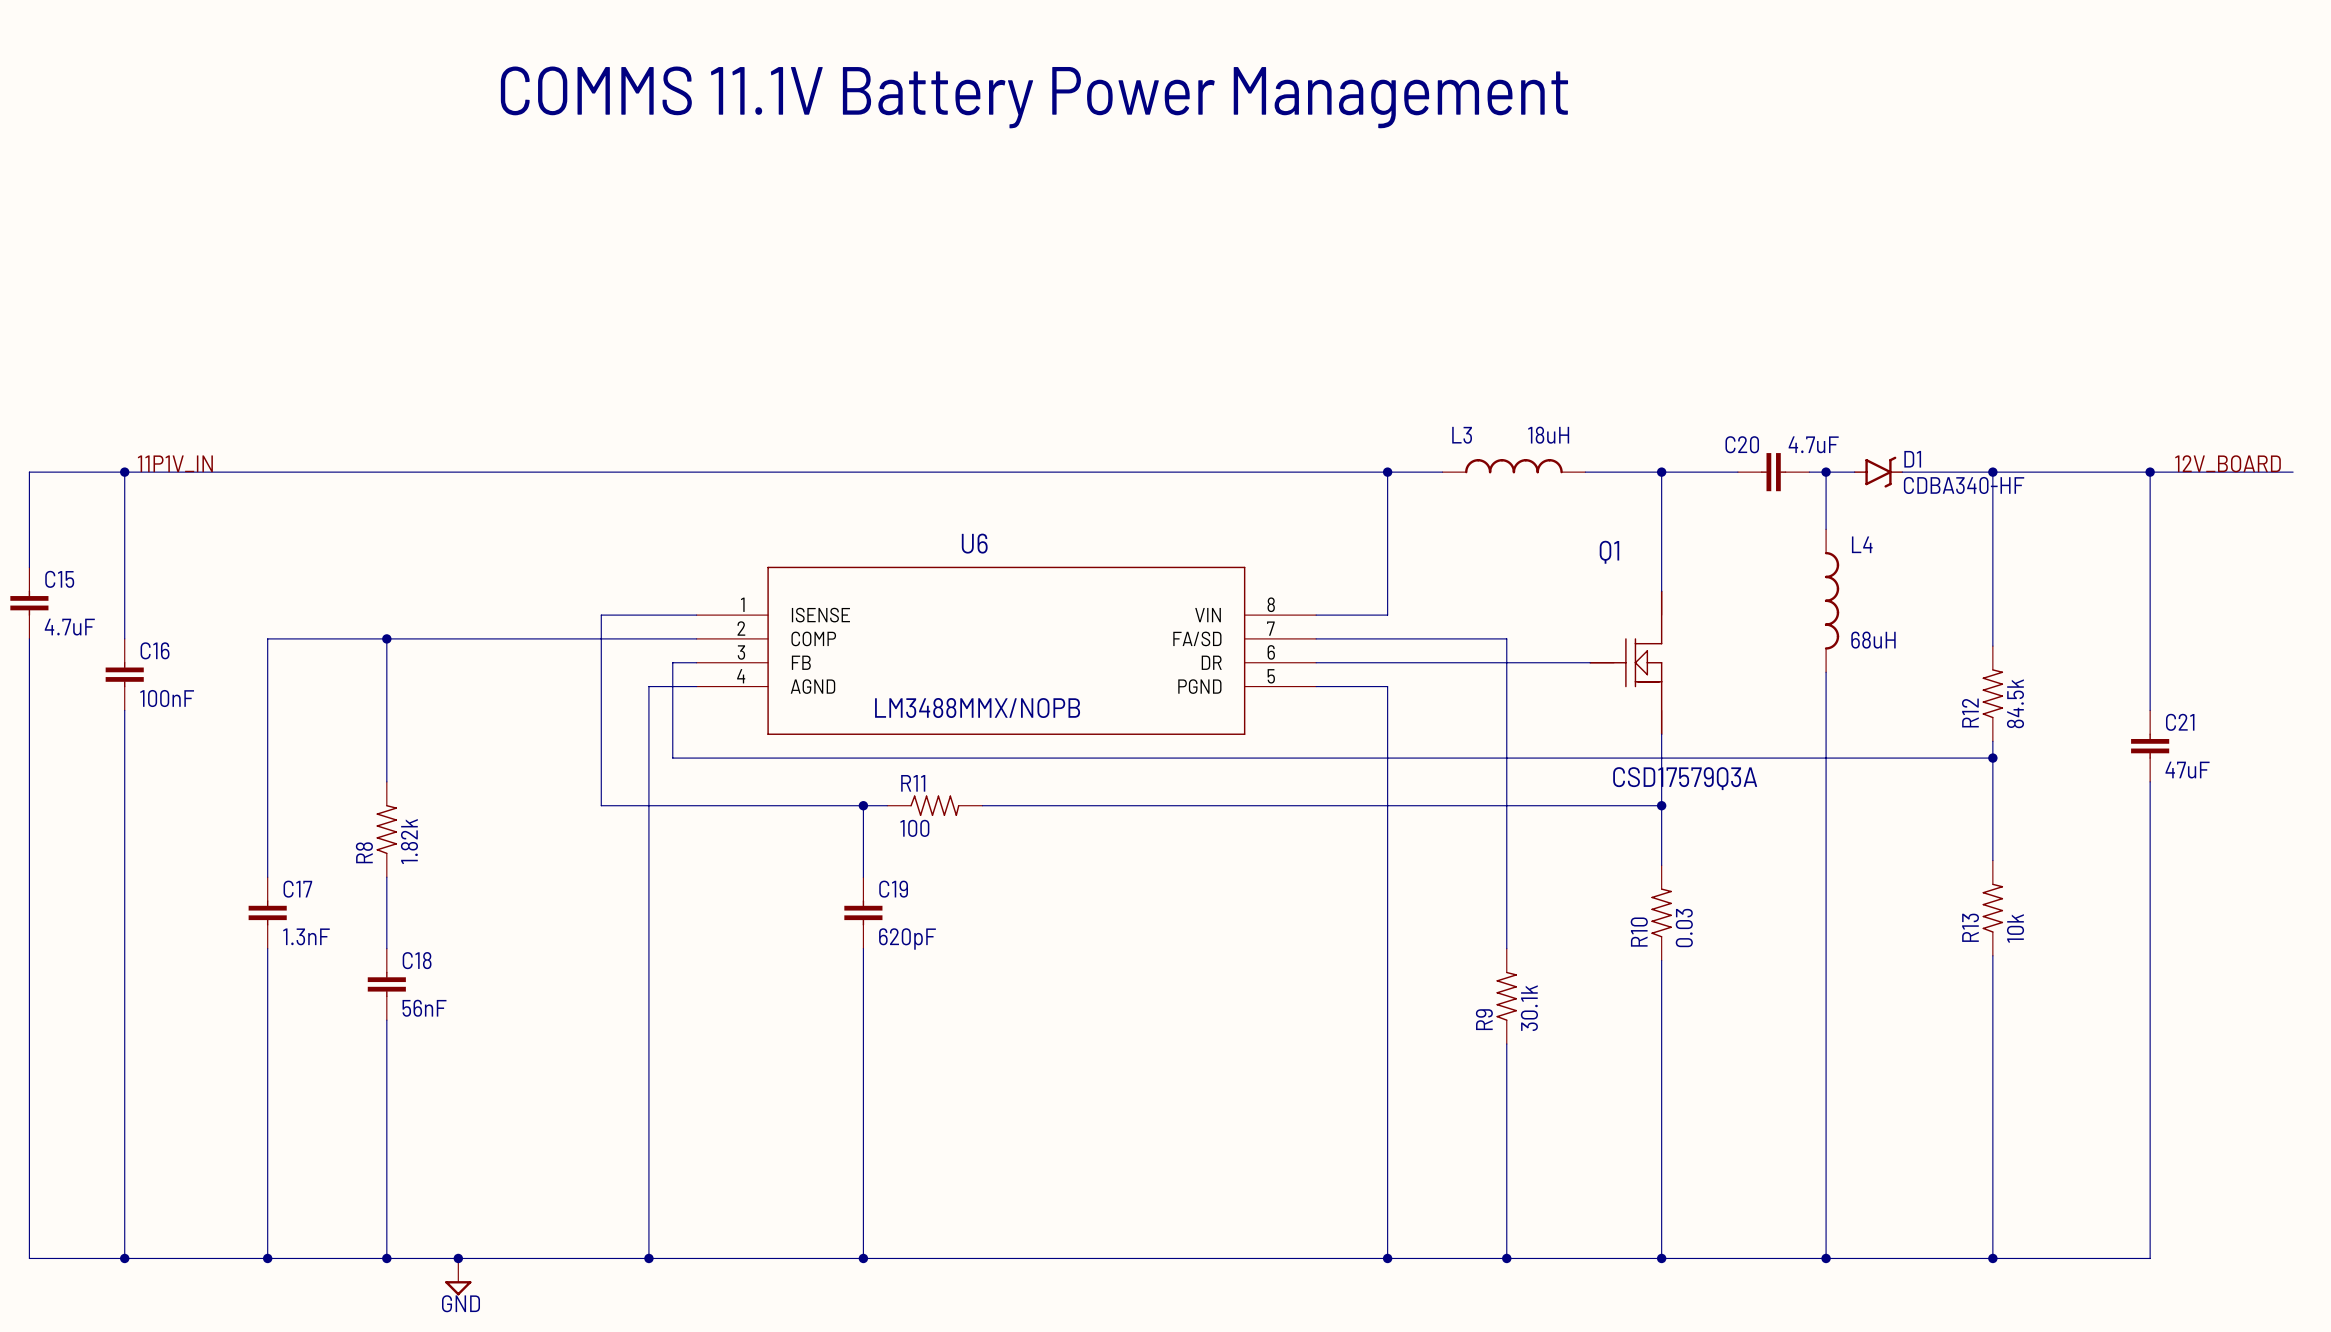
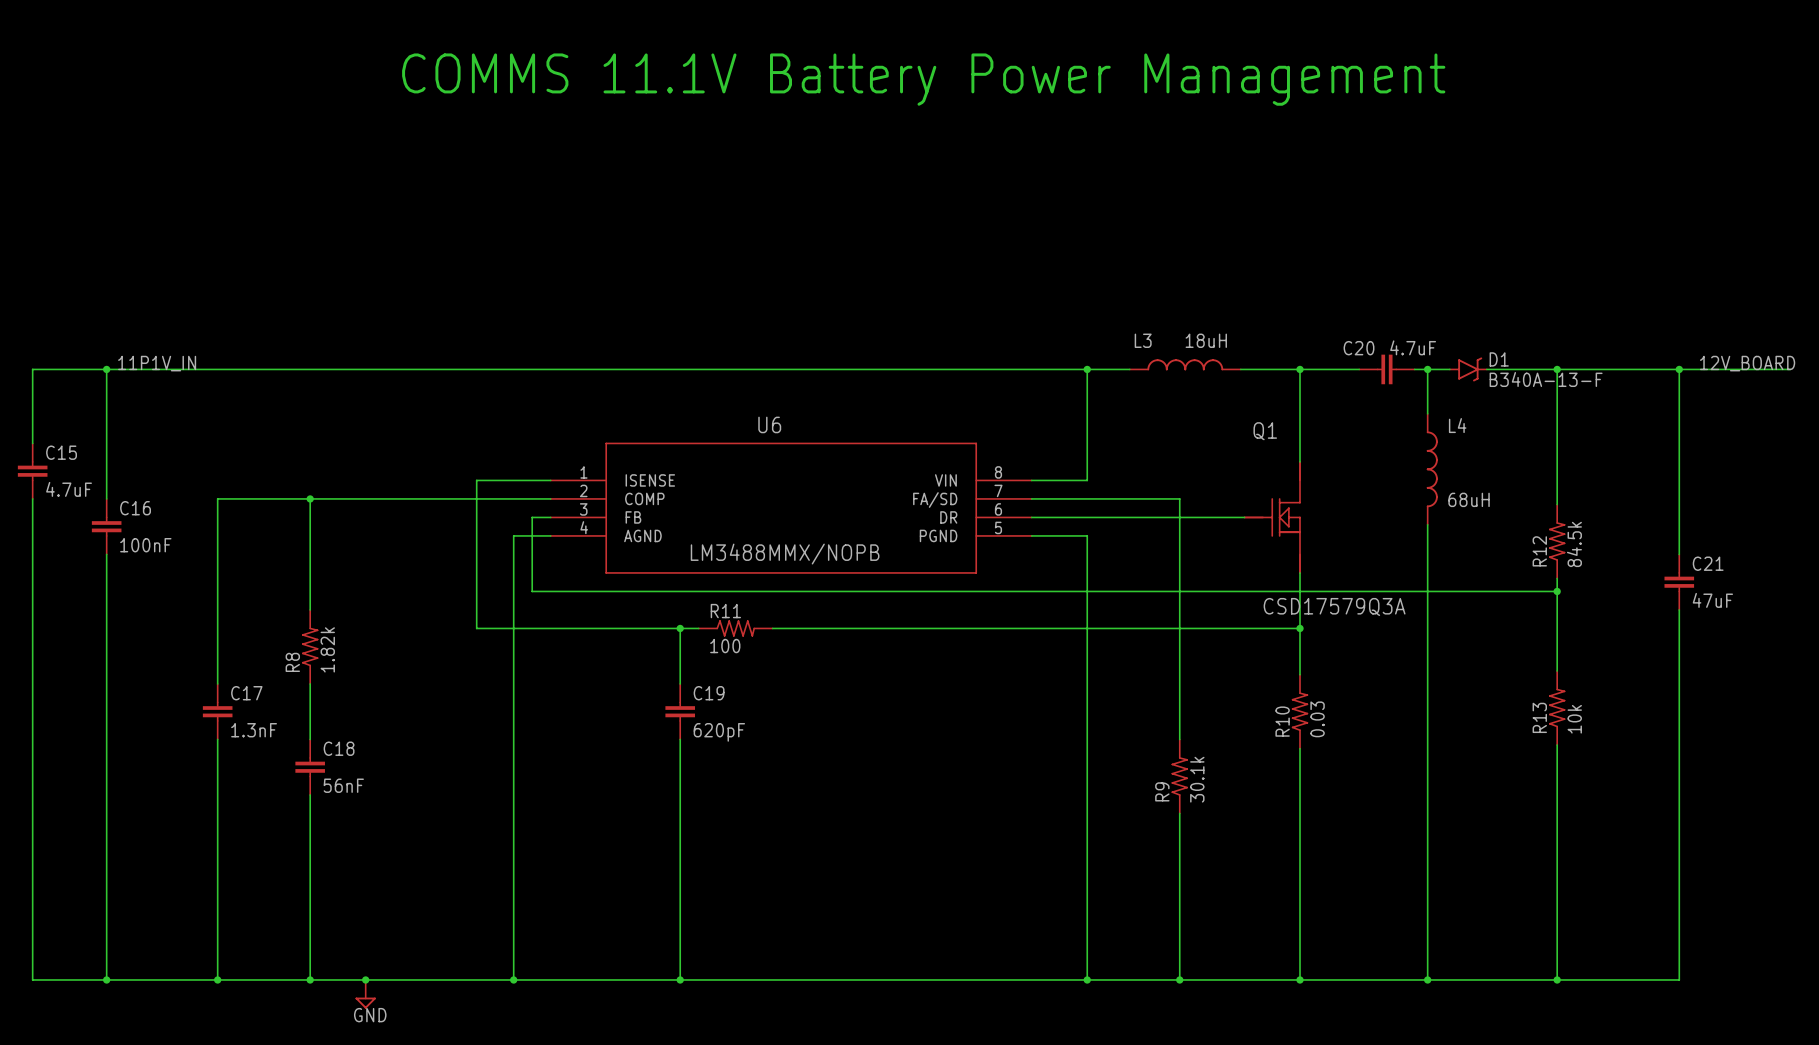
D1 value: CDBA340-HF (1964, 485) -> B340A-13-F (1546, 379)

